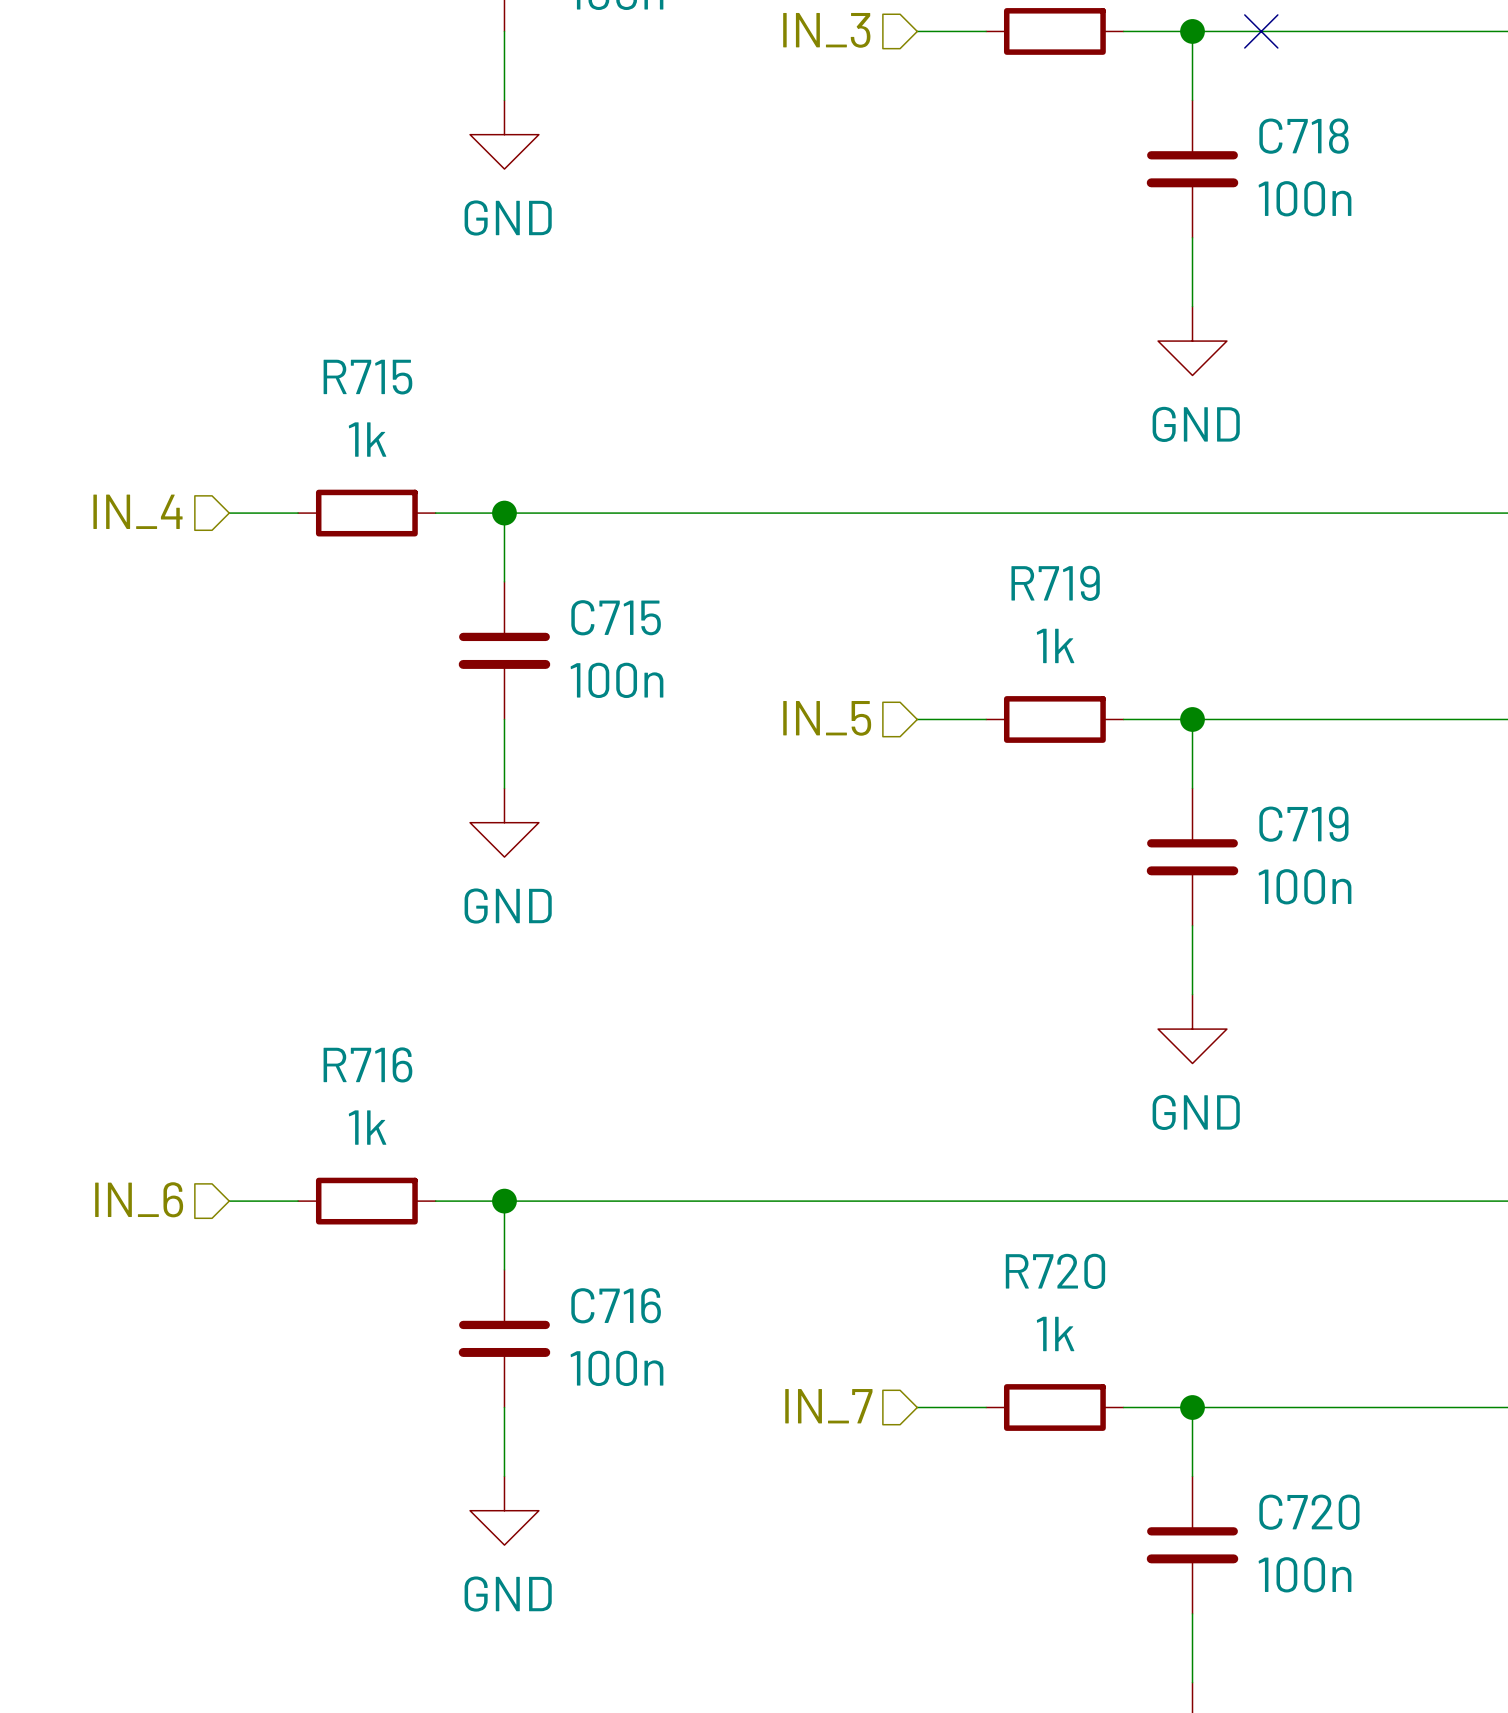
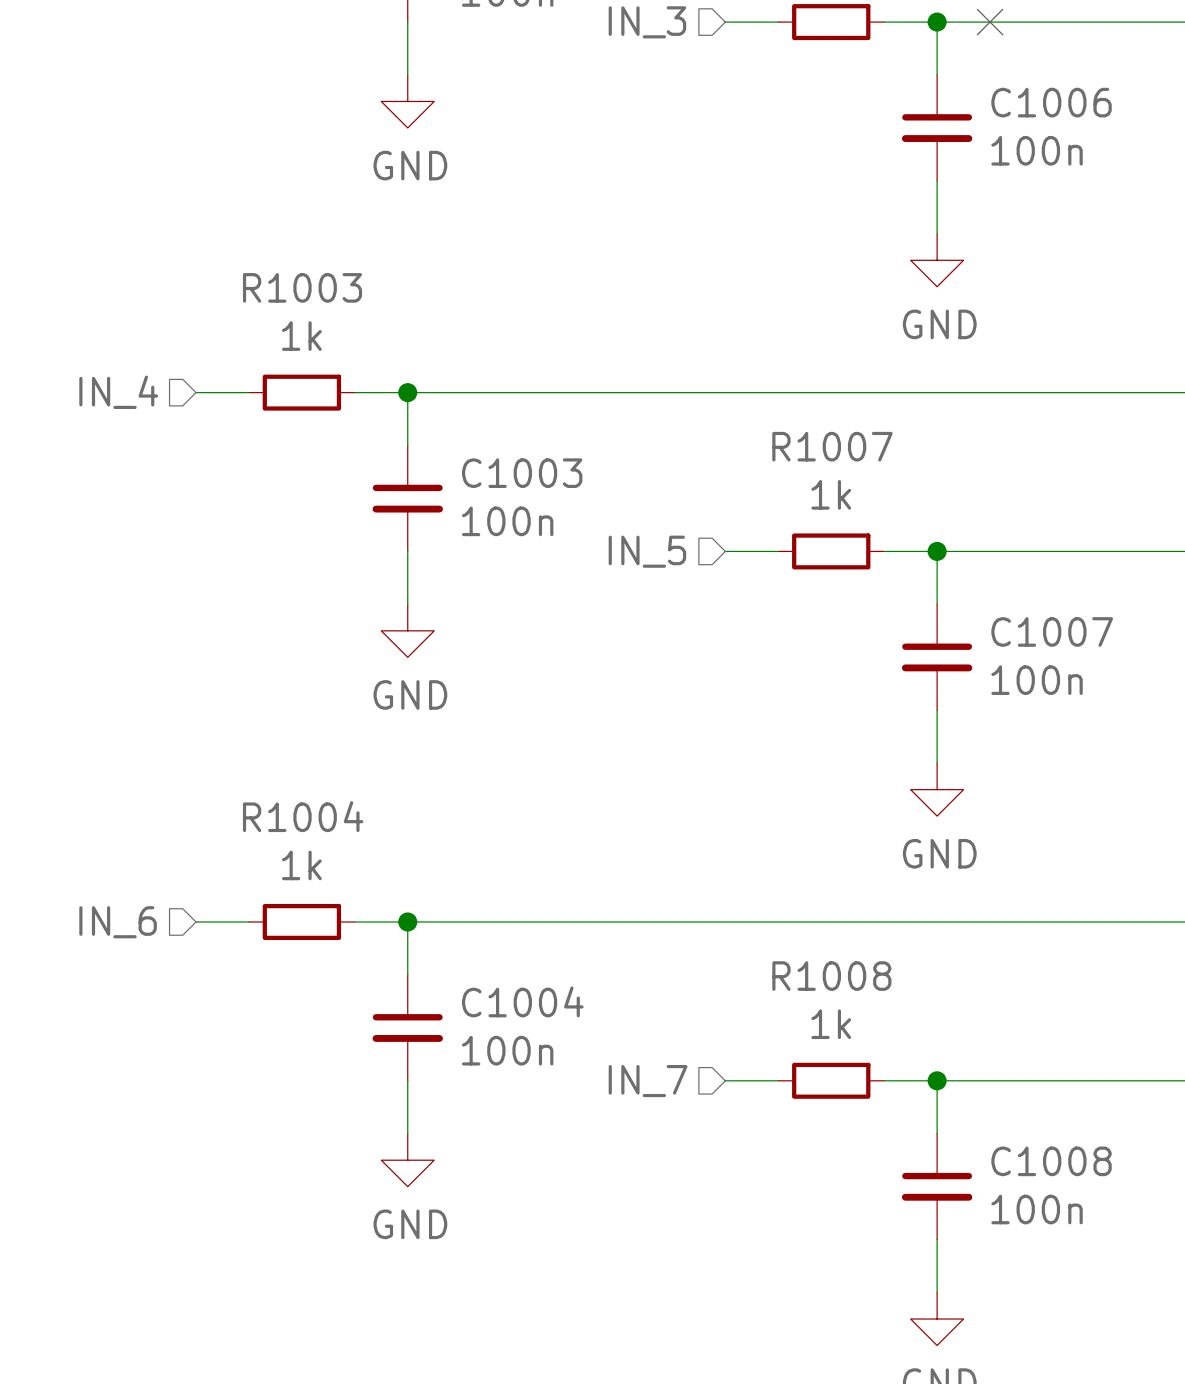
C718 name: C718 (1304, 136) -> C1006 (1051, 102)
R715 name: R715 (367, 377) -> R1003 (302, 287)
R719 name: R719 (1055, 583) -> R1007 (832, 446)
C715 name: C715 (616, 617) -> C1003 (522, 473)
C719 name: C719 (1303, 824) -> C1007 (1052, 631)
R716 name: R716 (367, 1064) -> R1004 (303, 816)
R720 name: R720 (1055, 1271) -> R1008 (831, 976)
C716 name: C716 (616, 1305) -> C1004 (522, 1001)
C720 name: C720 (1309, 1512) -> C1008 (1051, 1161)

